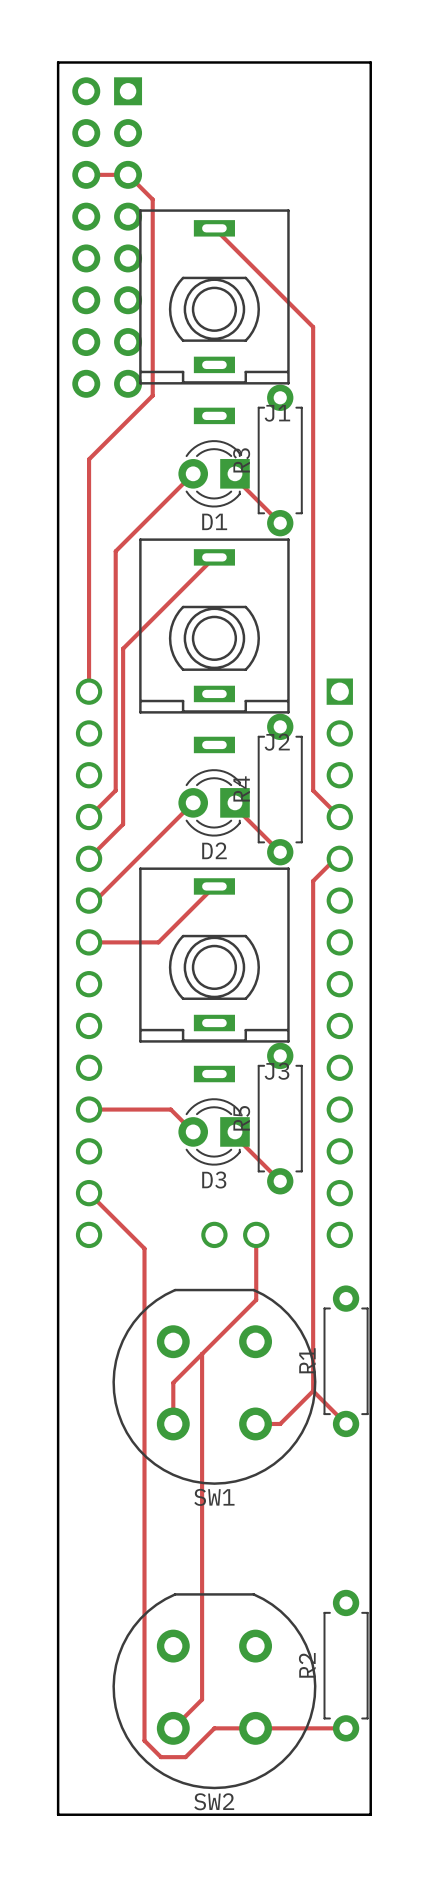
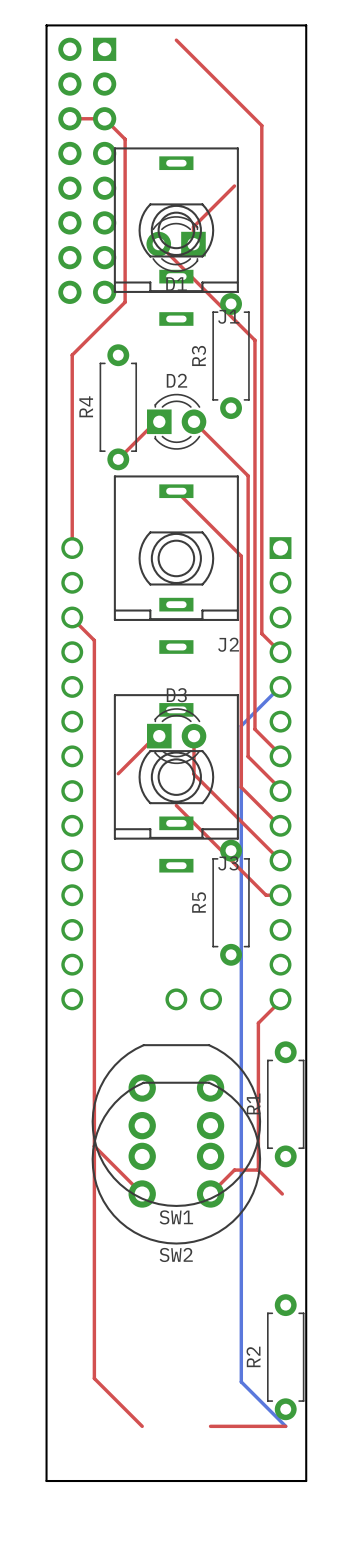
top track: (214, 228) (313, 327) (313, 790) (317, 794) -> (176, 40) (261, 125) (261, 633)
top track: none -> (234, 186) (193, 227) (193, 244)
top track: none -> (158, 244) (254, 340) (254, 729) (280, 754)
top track: (193, 473) (115, 551) (115, 790) (89, 817) -> none
D1 position: (214, 473) -> (176, 244)
top track: (234, 473) (234, 477) (280, 523) -> none
top track: none -> (159, 421) (155, 421) (118, 459)
top track: none -> (194, 421) (248, 475) (248, 756) (280, 789)
top track: (214, 557) (123, 648) (123, 824) (89, 858) -> none
top track: none -> (176, 491) (241, 556) (241, 787) (279, 825)
J2 position: (214, 645) -> (176, 564)
top track: none -> (72, 618) (94, 640) (94, 1378) (142, 1426)
R4 position: (280, 789) -> (118, 407)
top track: (193, 802) (95, 900) (89, 900) -> none
D2 rotation: 0° (214, 802) -> 180° (176, 421)
D2 position: (214, 802) -> (176, 421)
top track: (234, 802) (234, 806) (280, 852) -> none
top track: (339, 858) (335, 858) (313, 881) (313, 1263) -> (280, 1001) (258, 1023)
bottom track: none -> (280, 686) (241, 725) (241, 1381) (285, 1426)
top track: (214, 886) (158, 942) (89, 942) -> none
top track: none -> (159, 736) (155, 736) (118, 773)
top track: none -> (194, 736) (194, 774) (280, 860)
top track: none -> (176, 805) (266, 895) (280, 895)
top track: (89, 1109) (170, 1109) (193, 1131) -> none
D3 rotation: 0° (214, 1131) -> 180° (176, 736)
D3 position: (214, 1131) -> (176, 736)
top track: (234, 1131) (234, 1136) (280, 1181) -> none
top track: (89, 1193) (144, 1248) (144, 1740) (160, 1757) (185, 1757) (214, 1728) (346, 1728) -> none
top track: (256, 1234) (256, 1299) (173, 1382) (173, 1423) -> none
top track: (202, 1354) (202, 1699) (173, 1728) -> none
top track: none -> (258, 1129) (258, 1170)
top track: none -> (94, 1146) (142, 1193)
top track: (255, 1423) (280, 1423) (313, 1391) (346, 1423) -> none
top track: none -> (258, 1170) (234, 1170) (210, 1193)
top track: none -> (258, 1170) (282, 1193)
SW2 position: (214, 1691) -> (176, 1163)
top track: none -> (210, 1426) (285, 1426)

